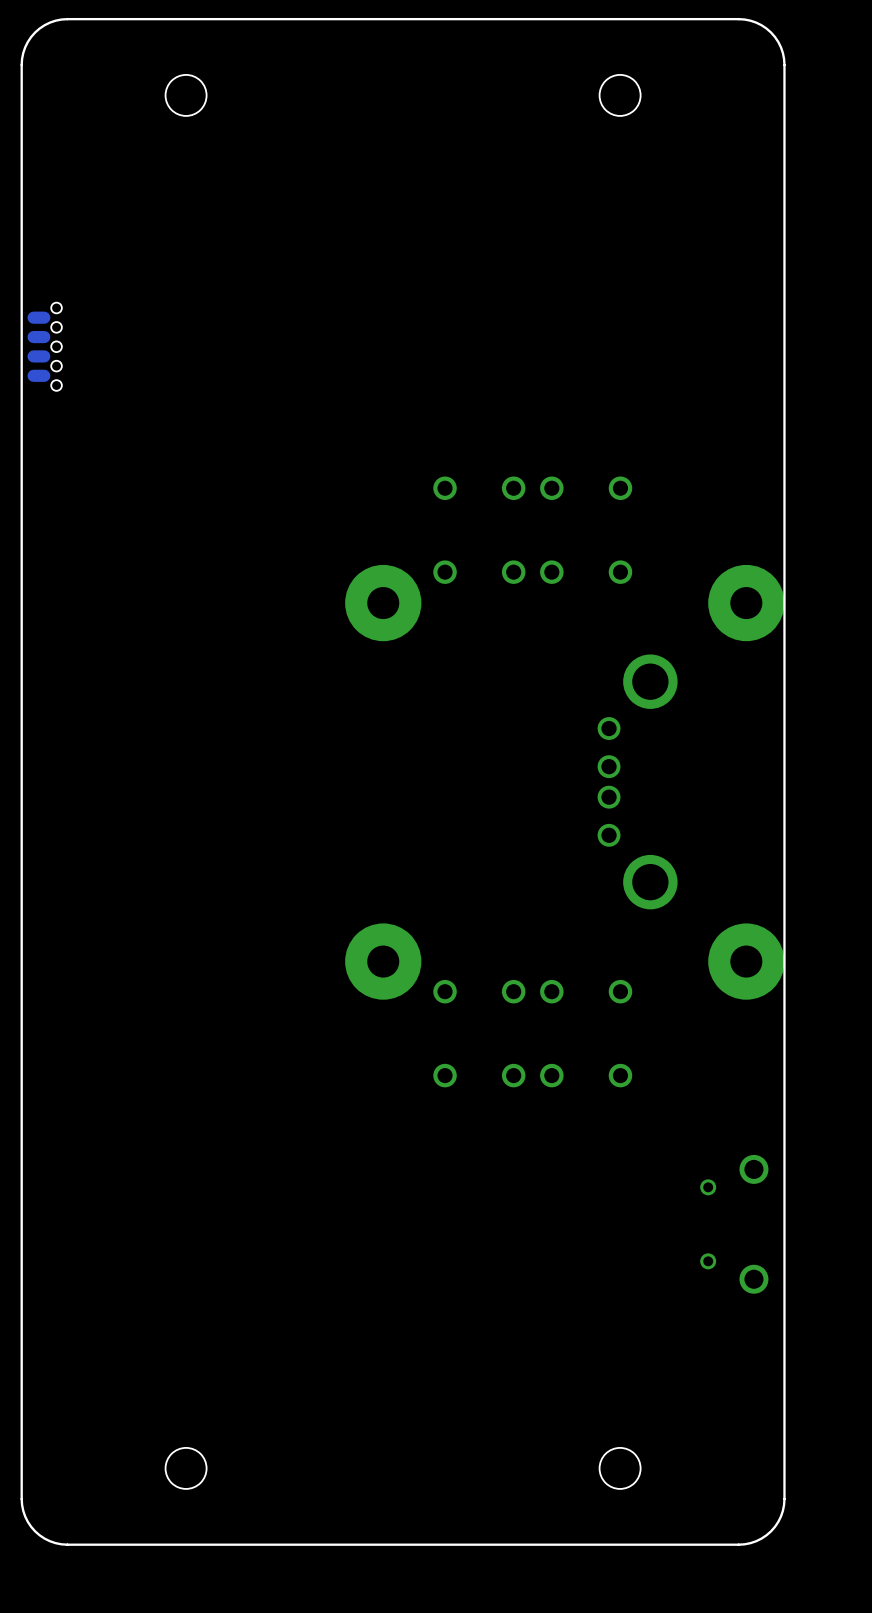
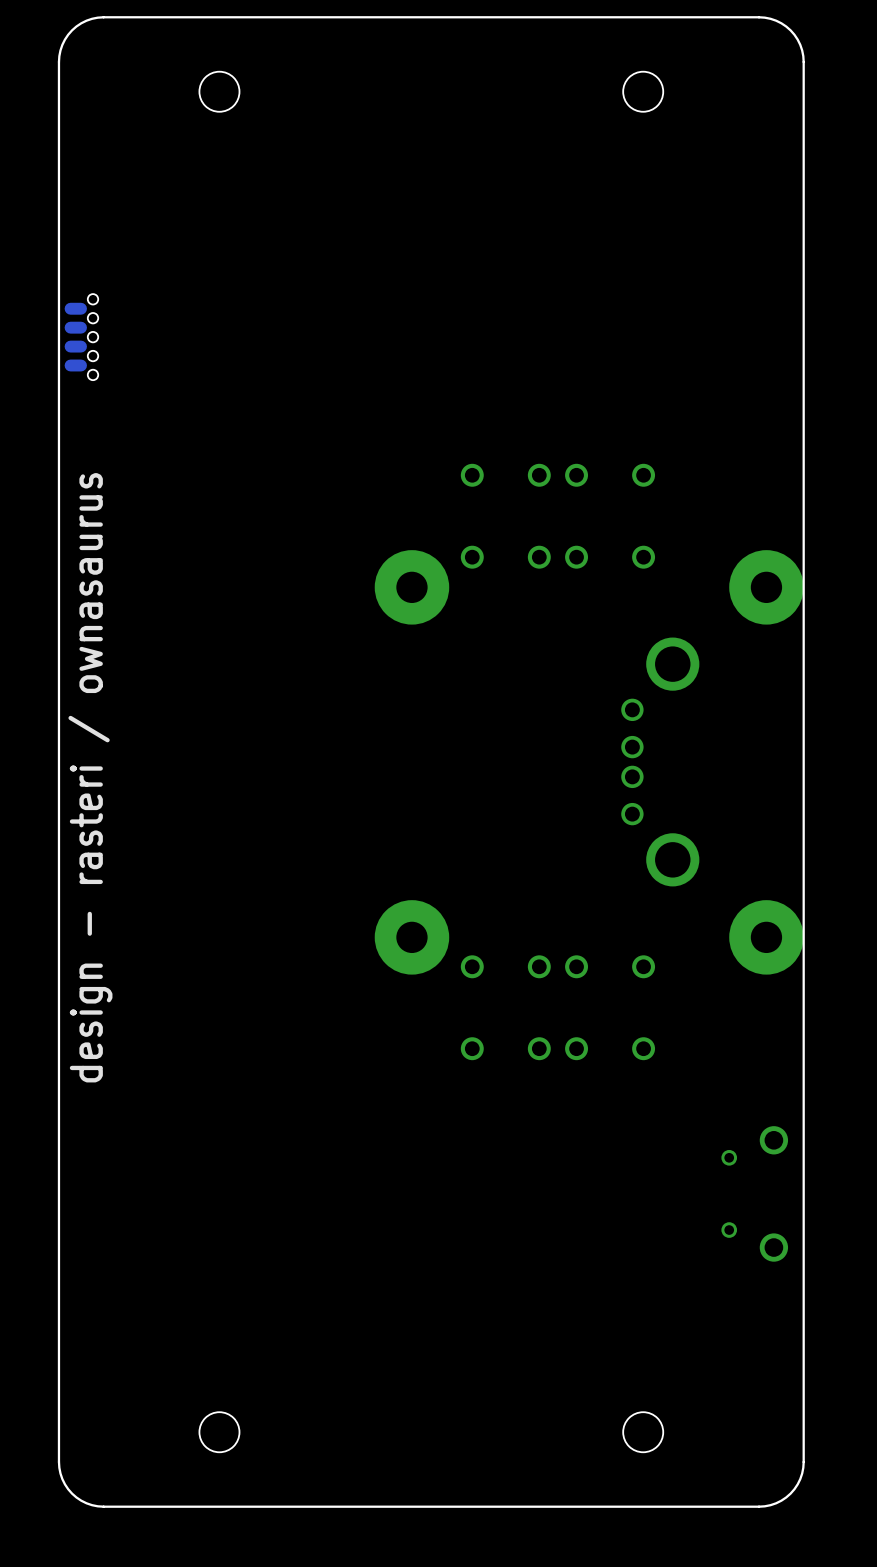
text: none -> design - rasteri / ownasaurus (90, 777)

